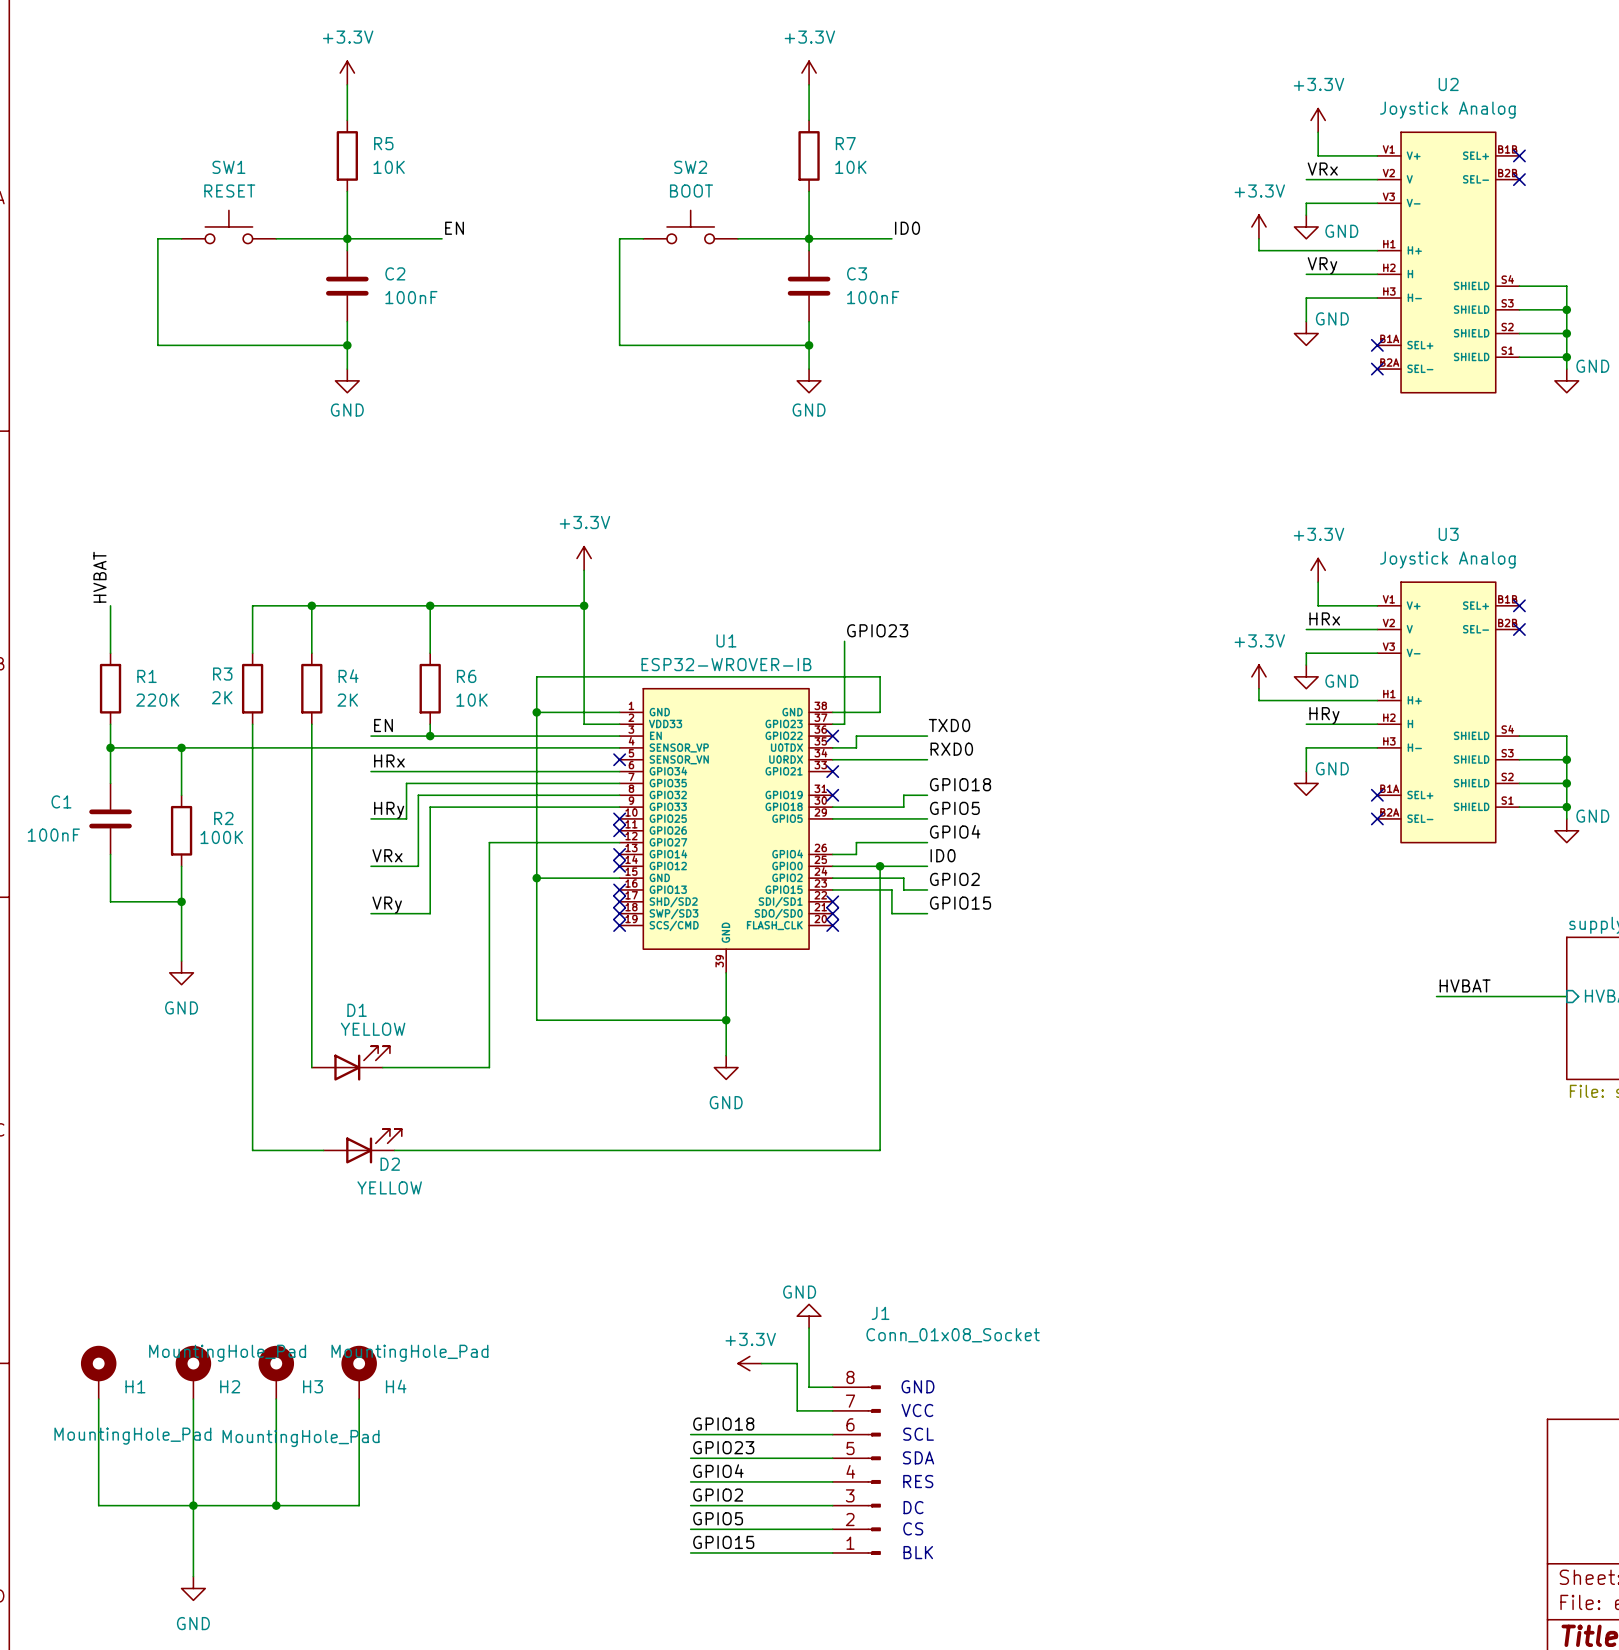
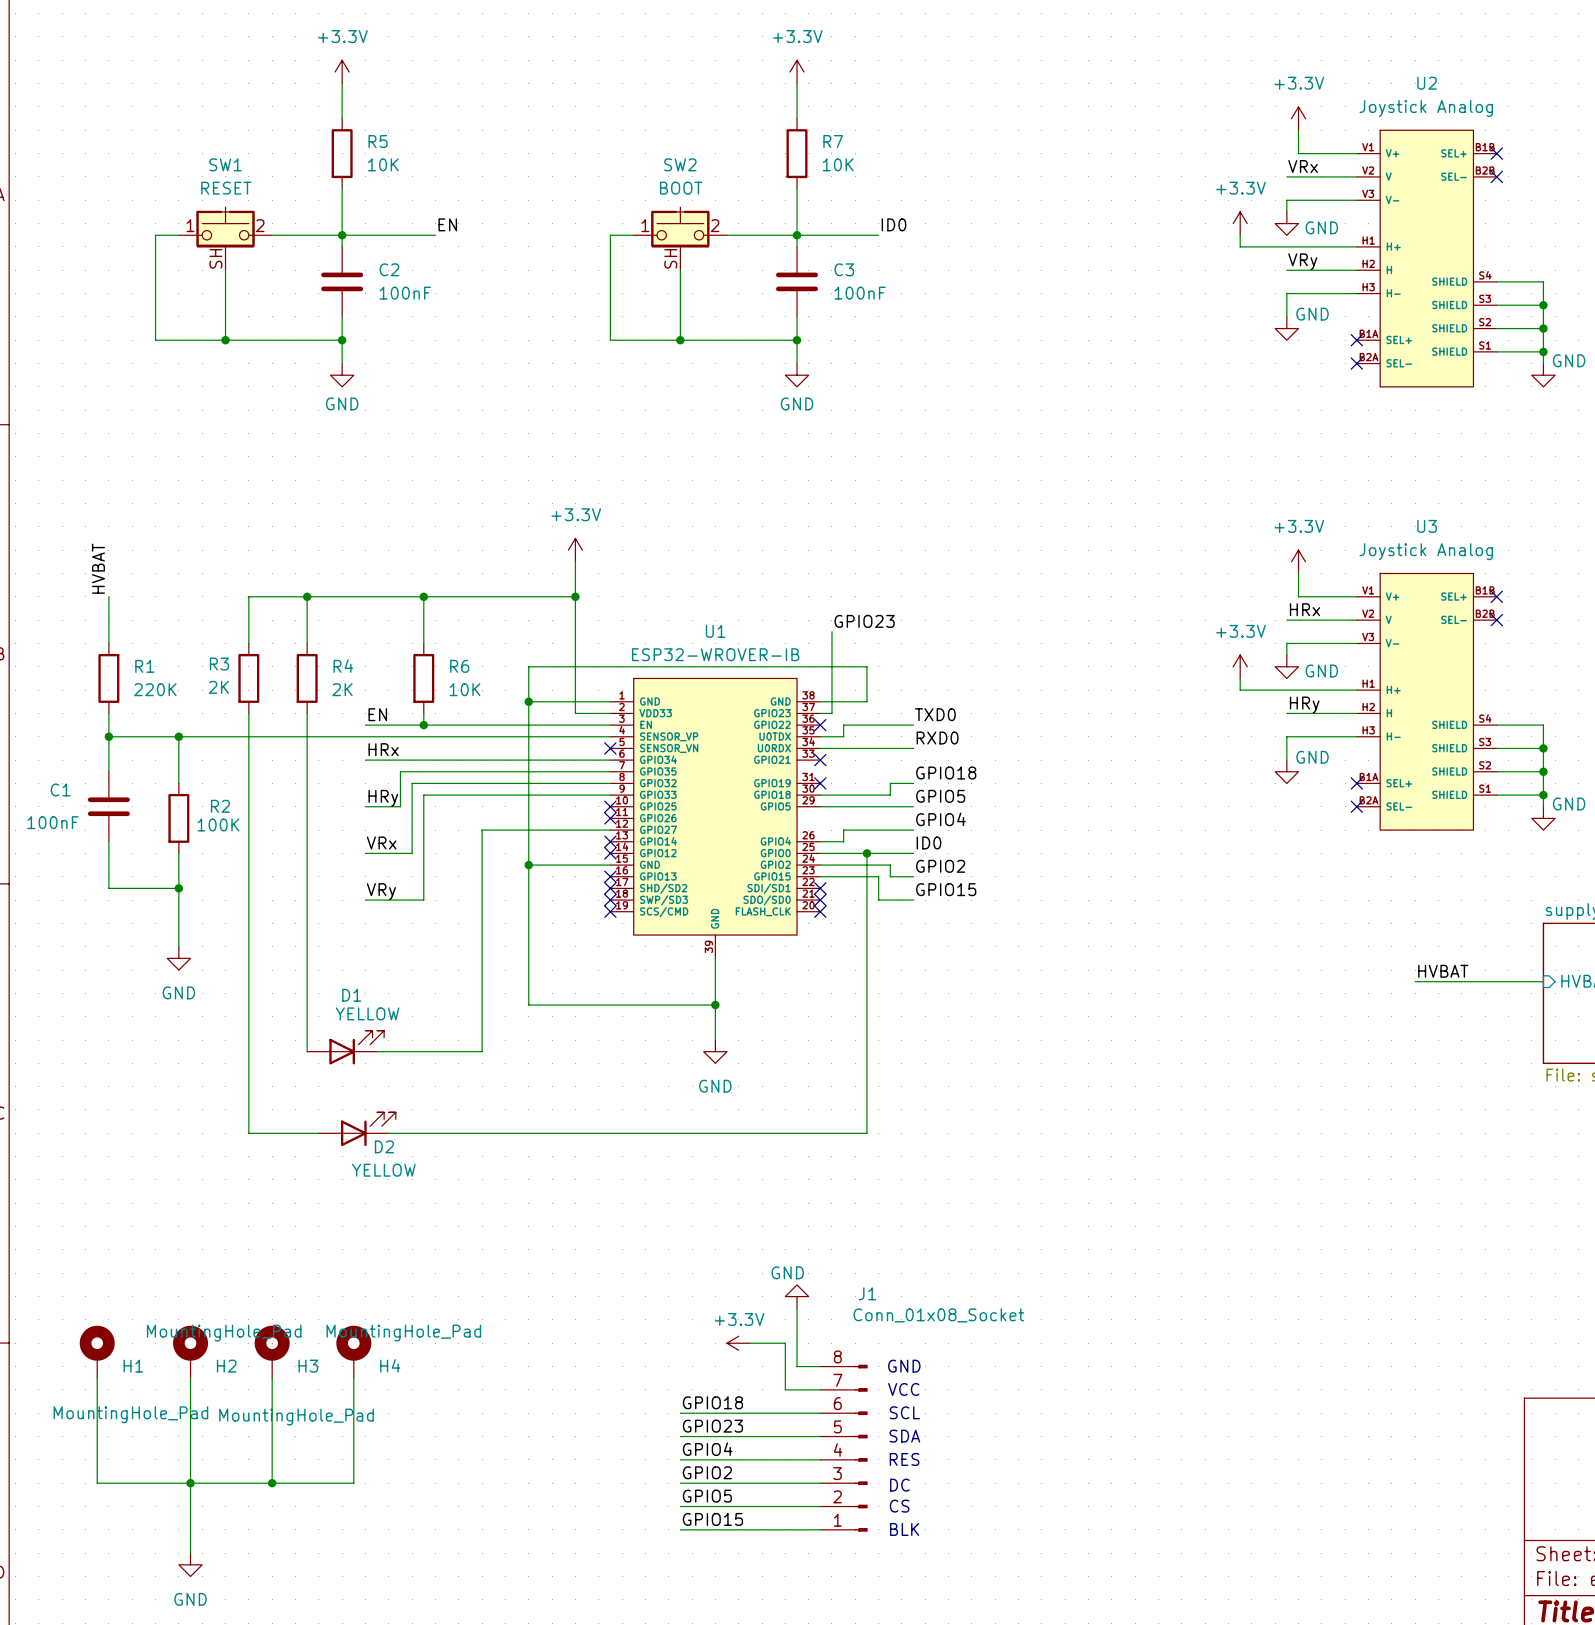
SW1 symbol: [181, 210, 277, 244] -> [178, 207, 273, 271]
SW2 symbol: [643, 210, 739, 244] -> [633, 207, 728, 271]
wire: none -> (225, 270) (225, 340)
wire: none -> (680, 270) (680, 340)
junction: none -> (225, 340)
junction: none -> (680, 340)

